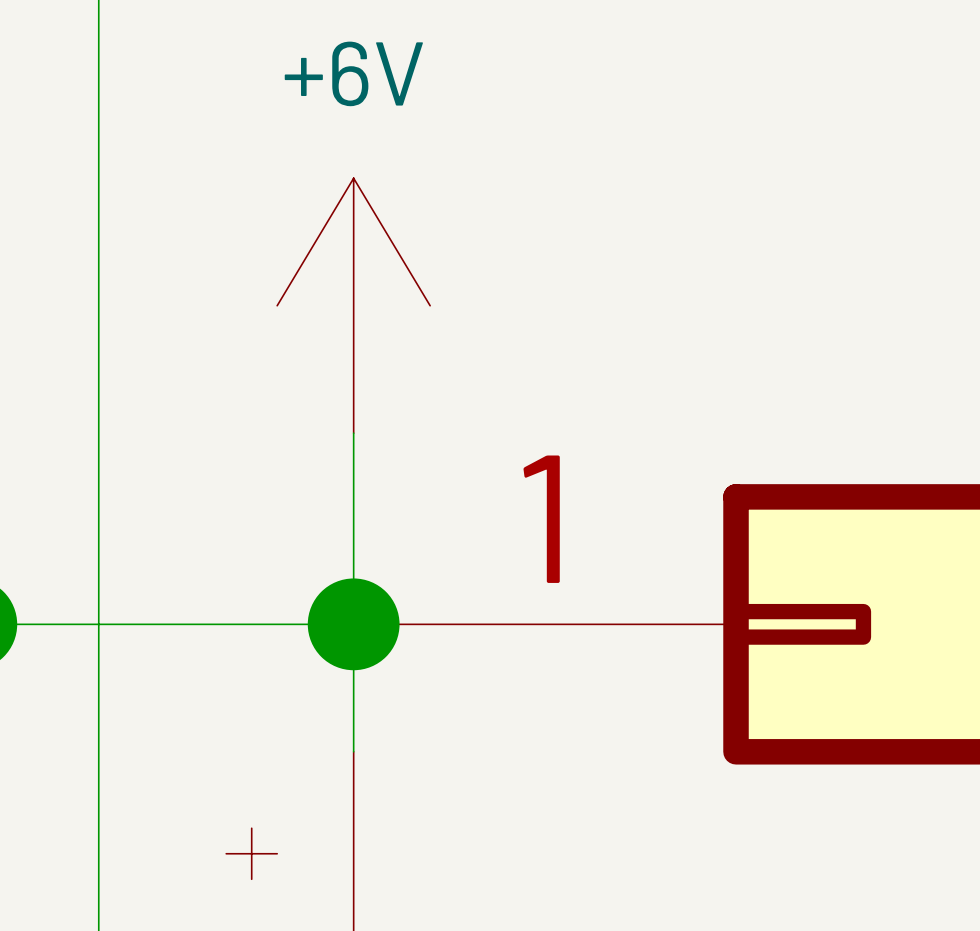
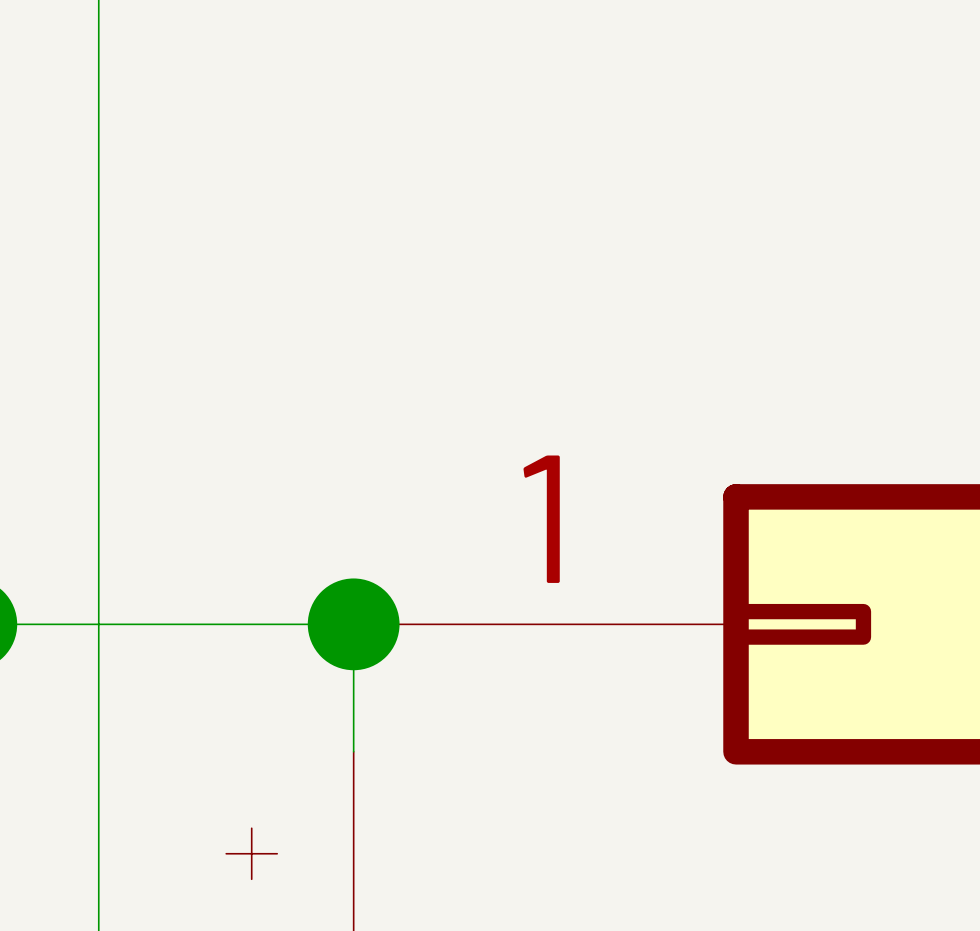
power symbol: +6V (353, 305) -> none
wire: (353, 433) (353, 624) -> none

